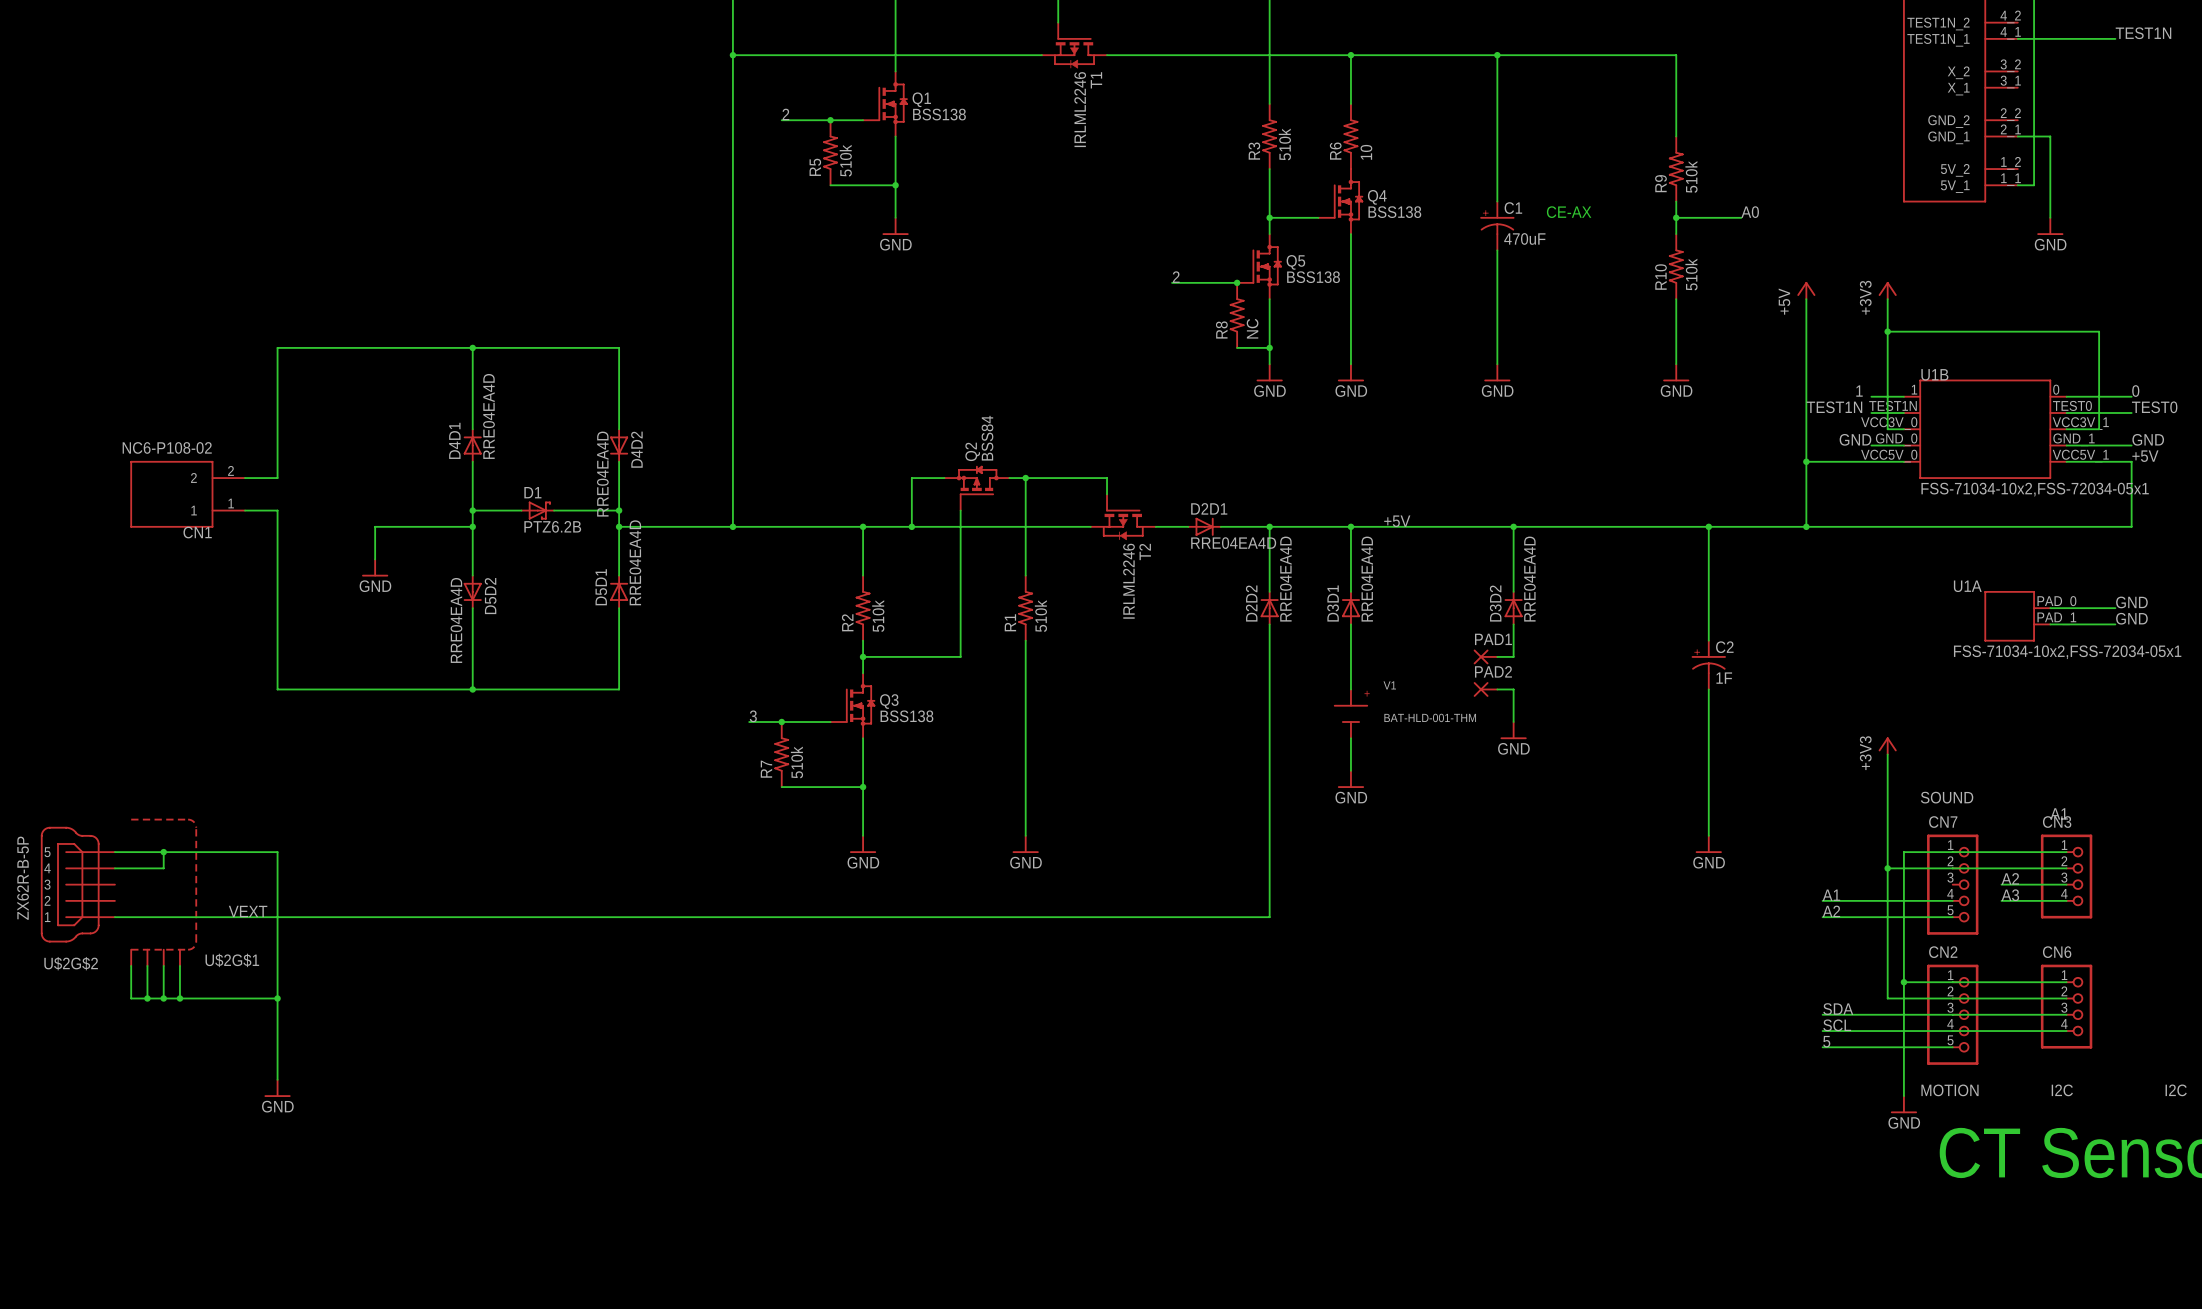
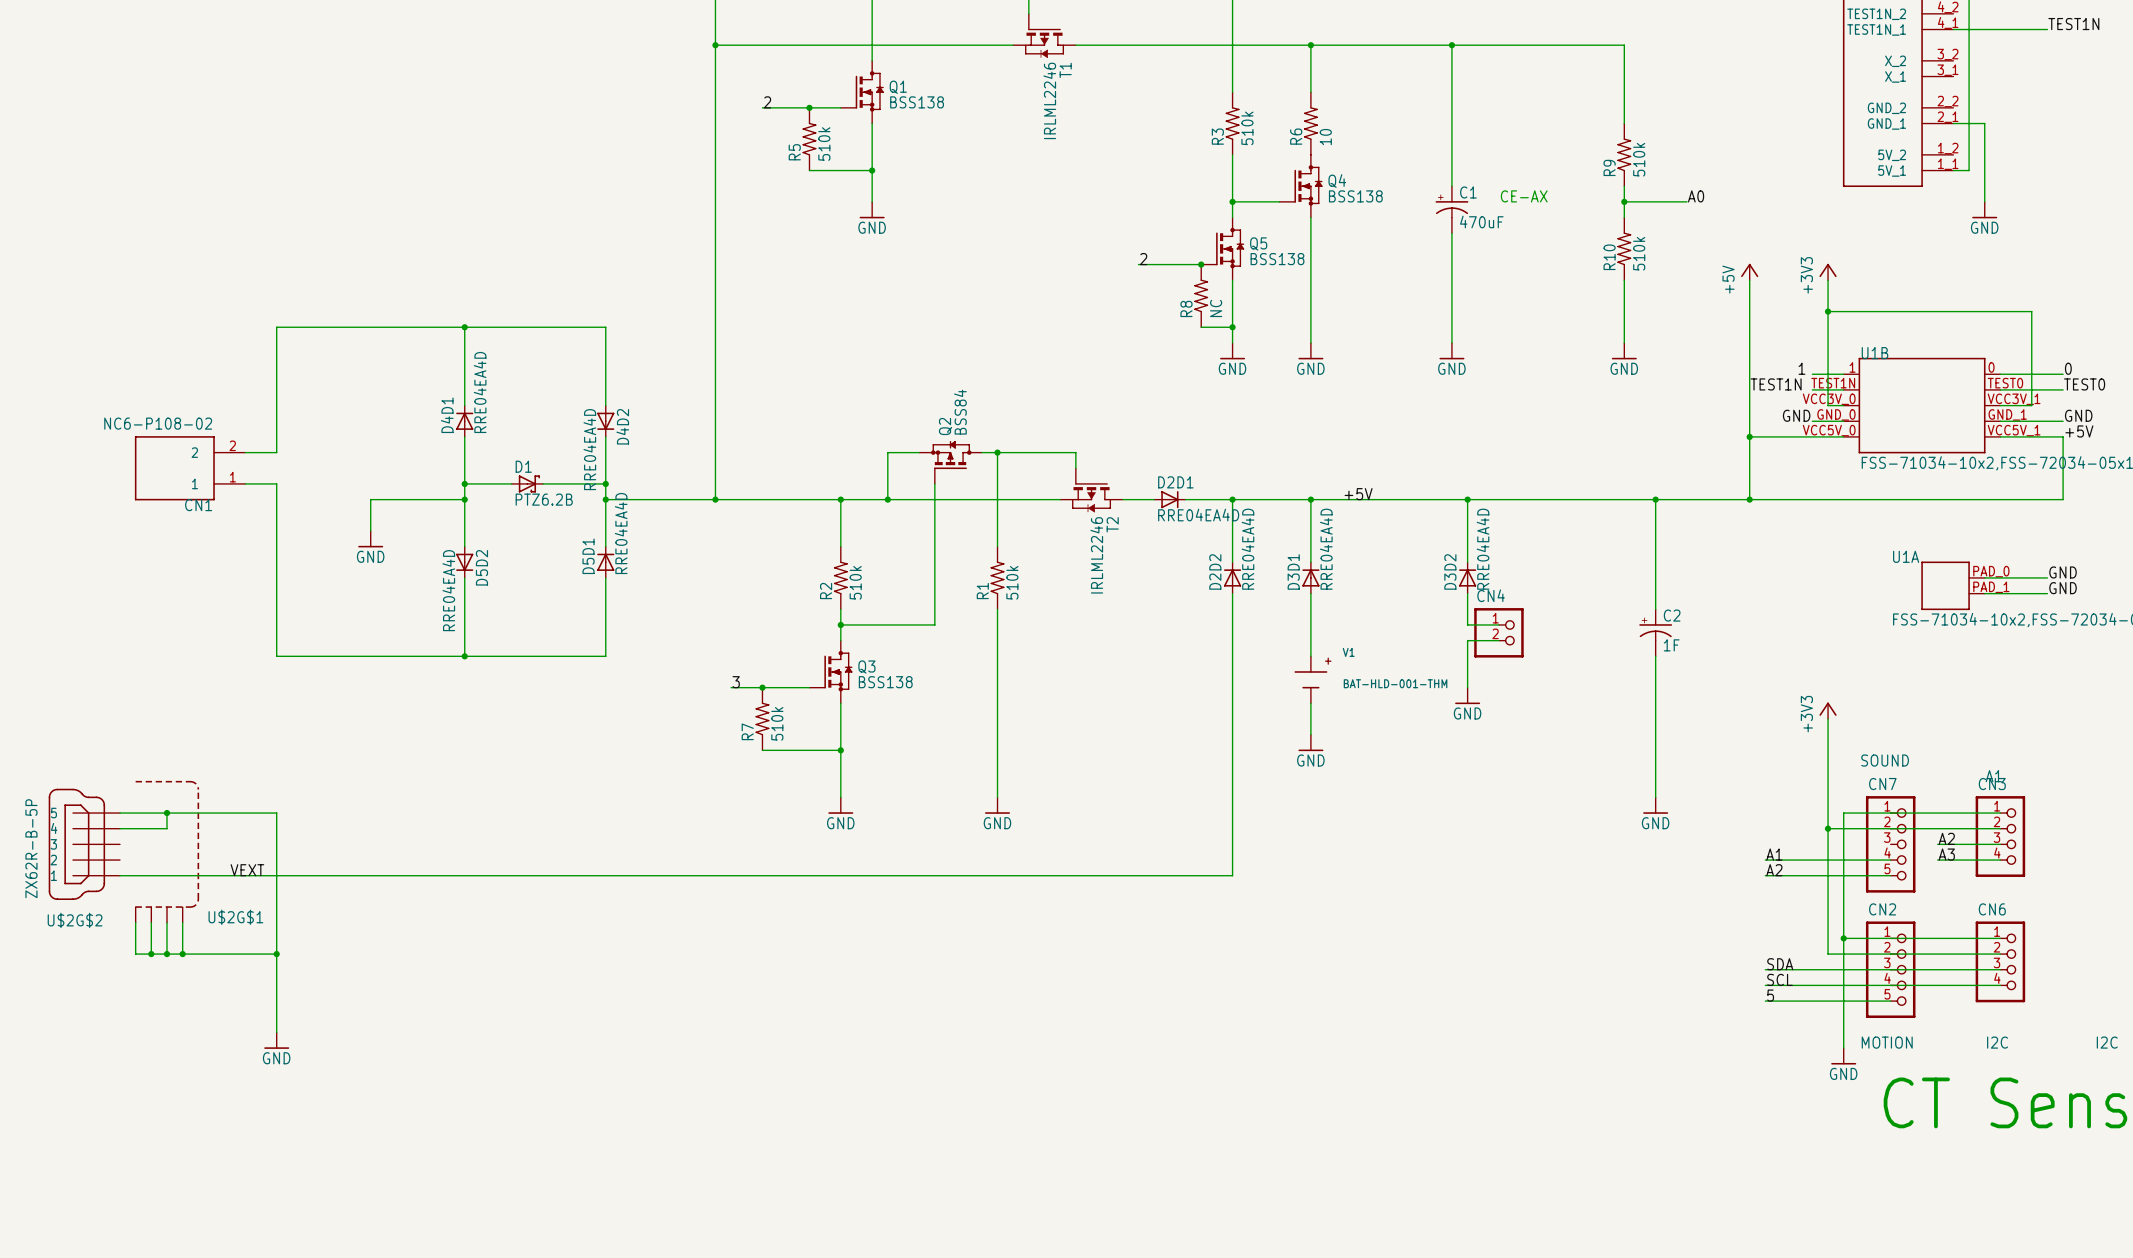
PAD1: (1485, 656) -> none
wire: (1497, 656) (1513, 656) -> (1498, 624) (1467, 624)
CN4: none -> (1498, 632)
PAD2: (1485, 689) -> none
wire: (1497, 689) (1513, 689) -> (1498, 640) (1467, 640) (1467, 656)

